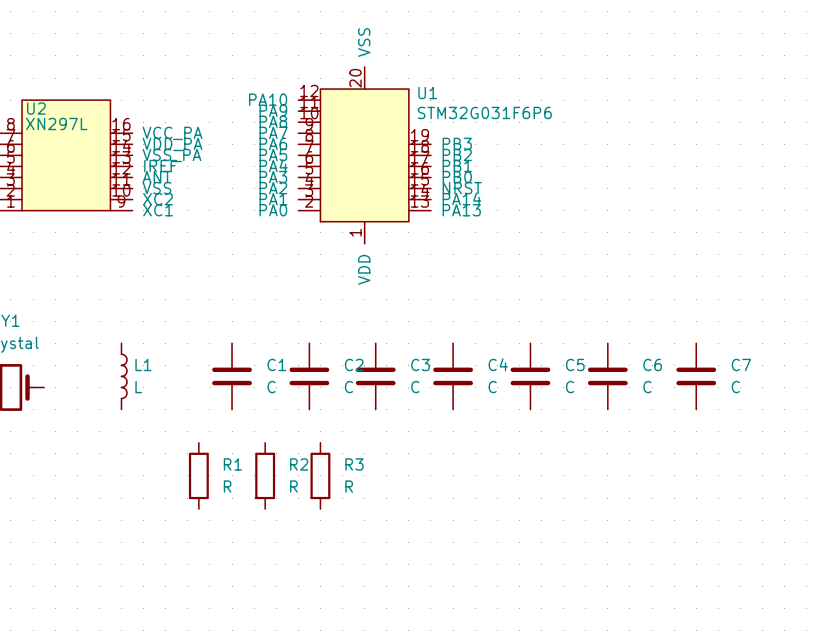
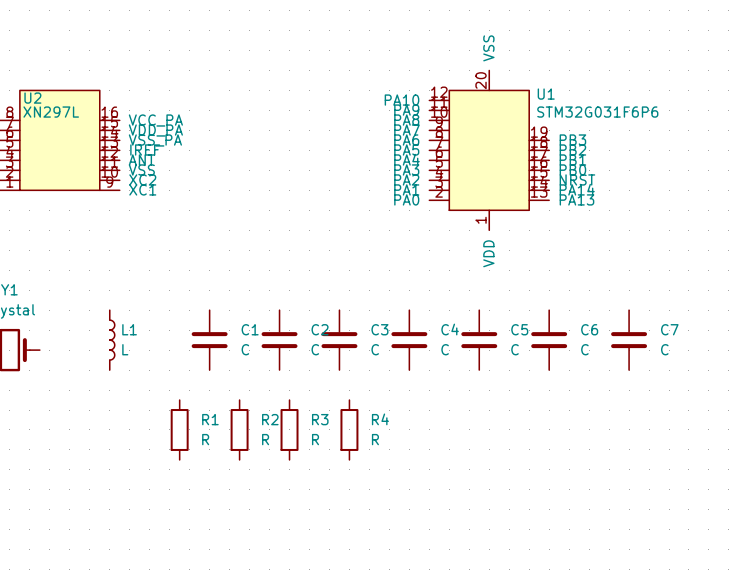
U1 position: (364, 155) -> (489, 150)
R4: none -> R (349, 429)

